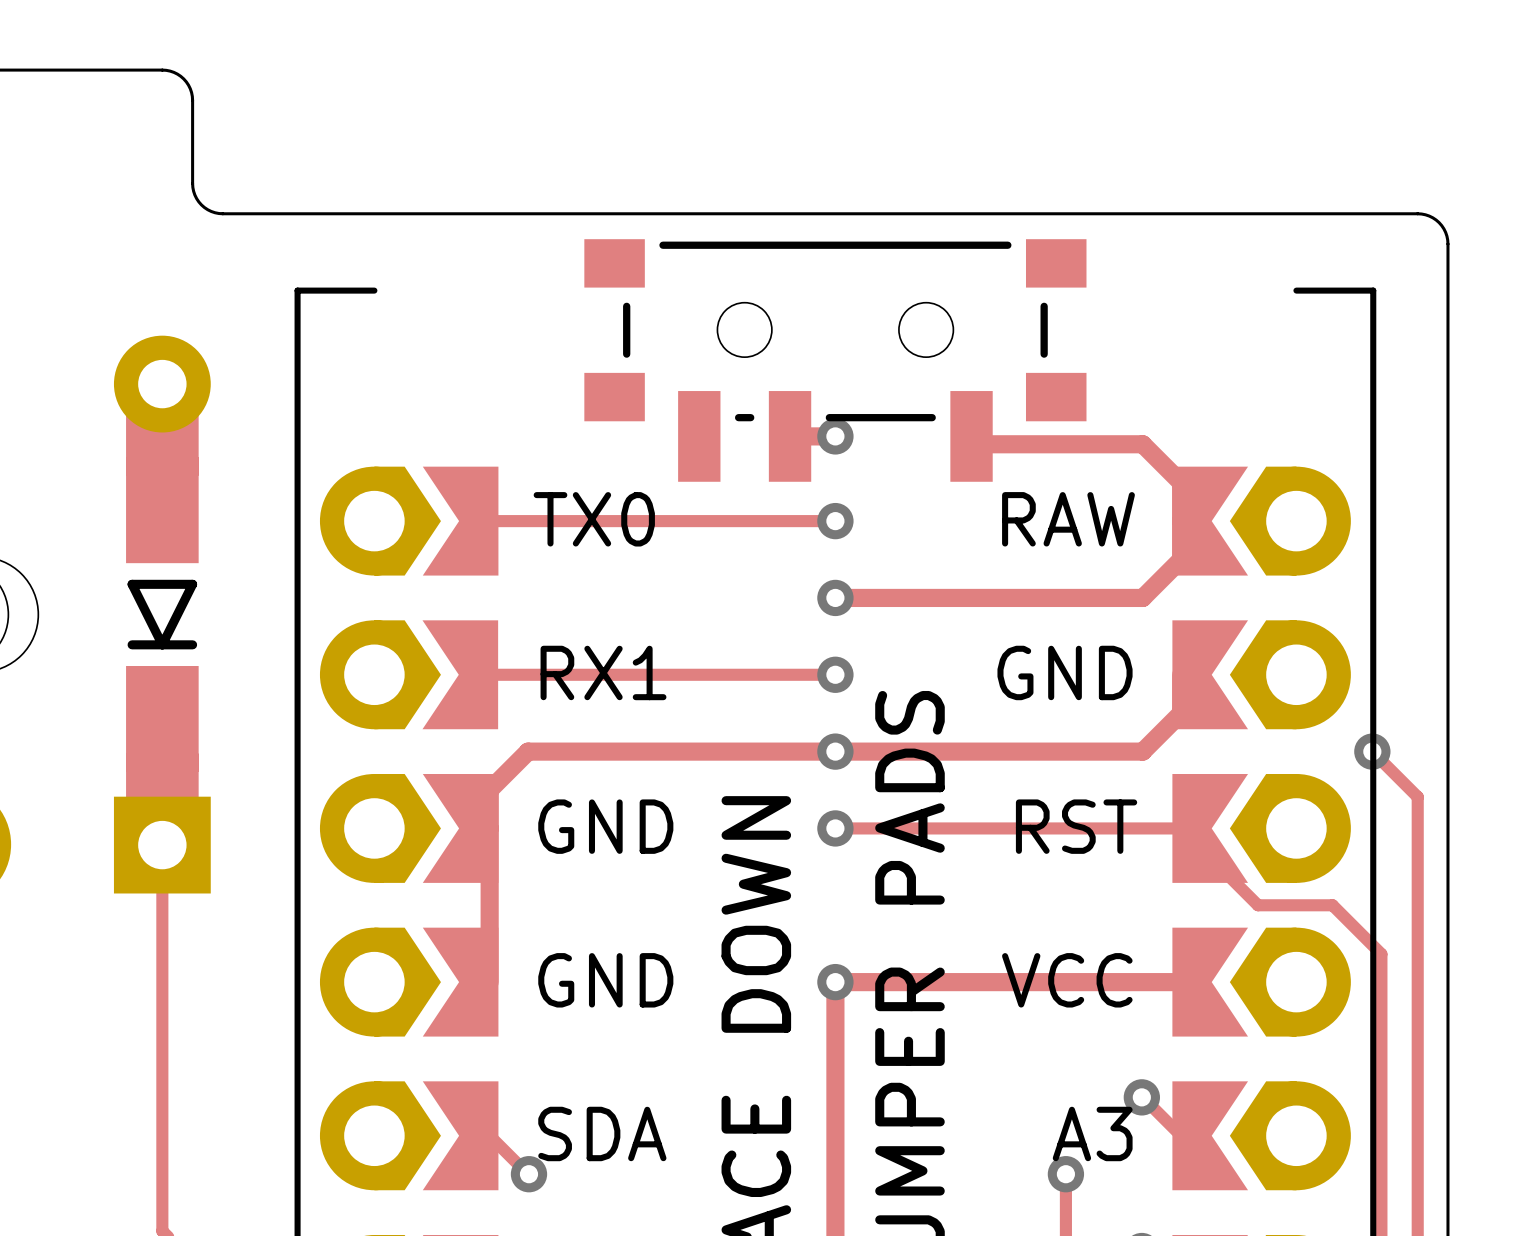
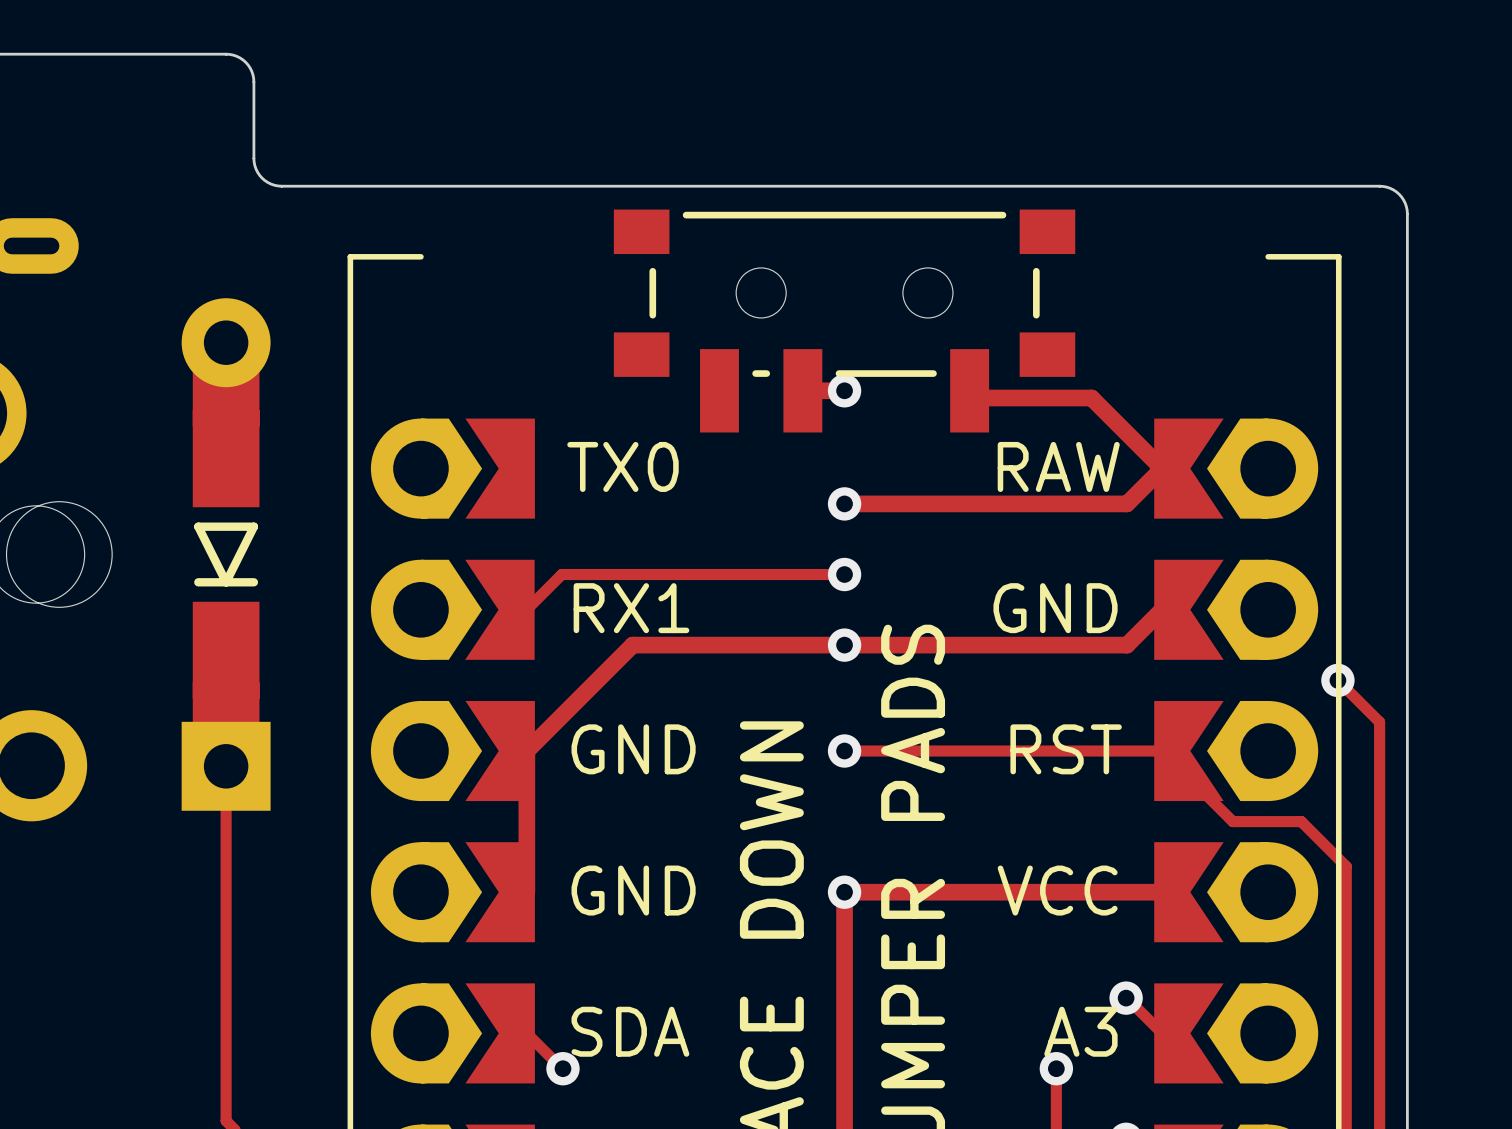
track: (1104, 444) (1142, 444) (1181, 482) (1181, 559) (1142, 597) (835, 597) -> (1091, 398) (1162, 468) (1126, 503) (844, 503)
track: (489, 521) (835, 521) -> none
via: (835, 521) -> none
via: none -> (844, 503)
via: (835, 597) -> none
via: none -> (844, 574)
track: (489, 674) (835, 674) -> (526, 609) (561, 574) (844, 574)
via: (835, 674) -> none
track: (1181, 674) (1181, 713) (1142, 751) (528, 751) (489, 790) (489, 828) -> (1162, 609) (1126, 645) (632, 645) (526, 751)
via: none -> (844, 645)
via: (835, 751) -> none

